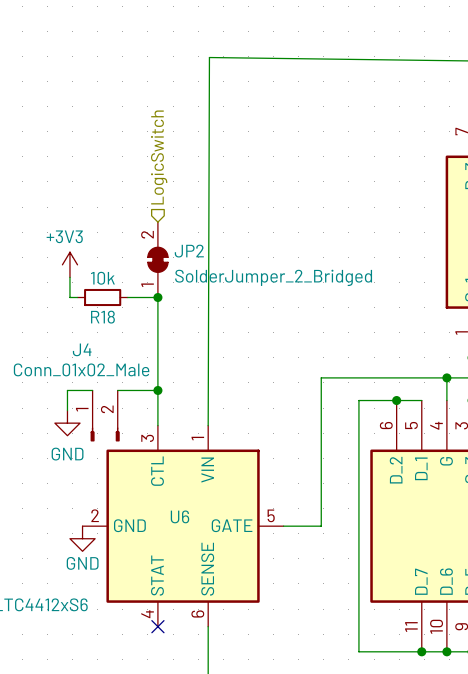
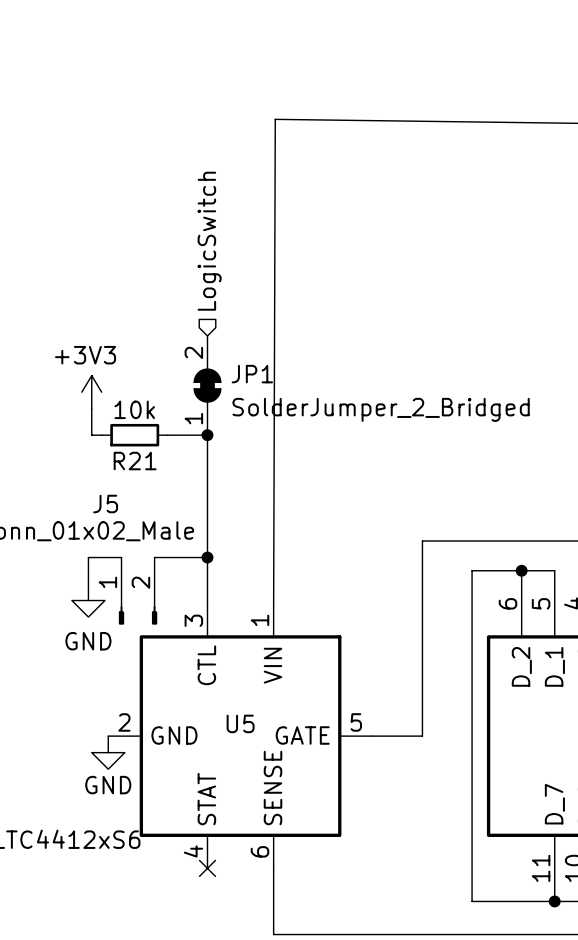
JP2 name: JP2 (189, 251) -> JP1 (252, 374)
R18 name: R18 (102, 317) -> R21 (135, 461)
J4 name: J4 (82, 349) -> J5 (105, 504)
U6 name: U6 (179, 516) -> U5 (240, 723)

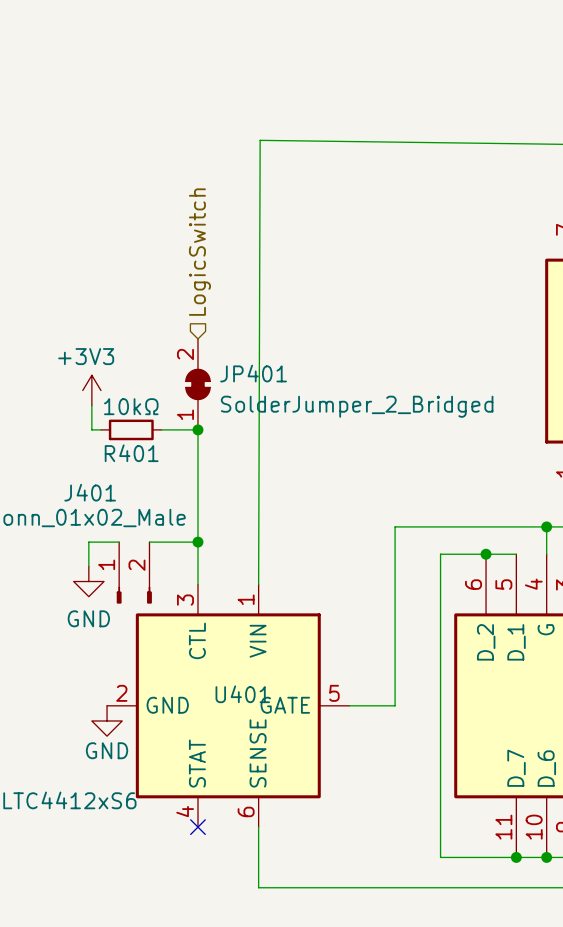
JP1 name: JP1 (252, 374) -> JP401 (253, 373)
R21 value: 10k (134, 409) -> 10kΩ (131, 406)
R21 name: R21 (135, 461) -> R401 (131, 453)
J5 name: J5 (105, 504) -> J401 (90, 492)
U5 name: U5 (240, 723) -> U401 (242, 694)

